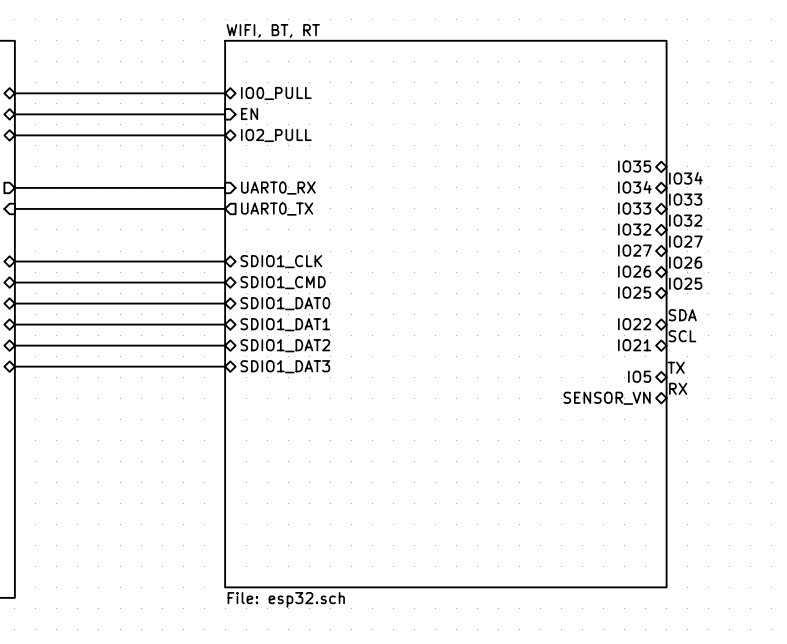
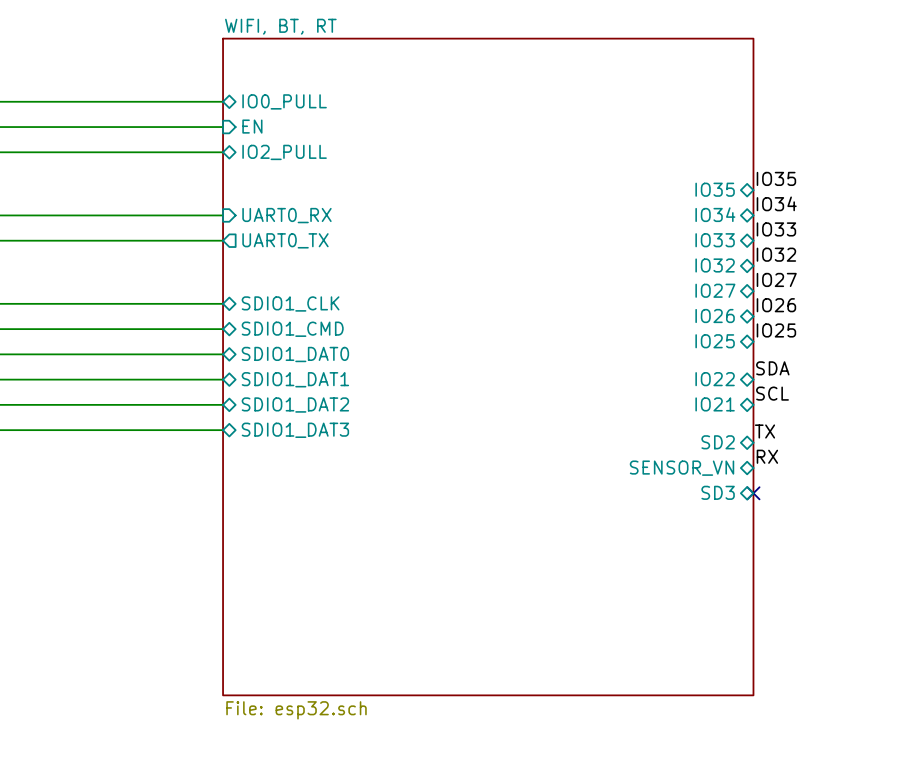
label: none -> IO35 (776, 178)
sheet pin: IO5 (639, 376) -> SD2 (718, 442)
sheet pin: none -> SD3 (718, 492)
no-connect mark: none -> (753, 493)

